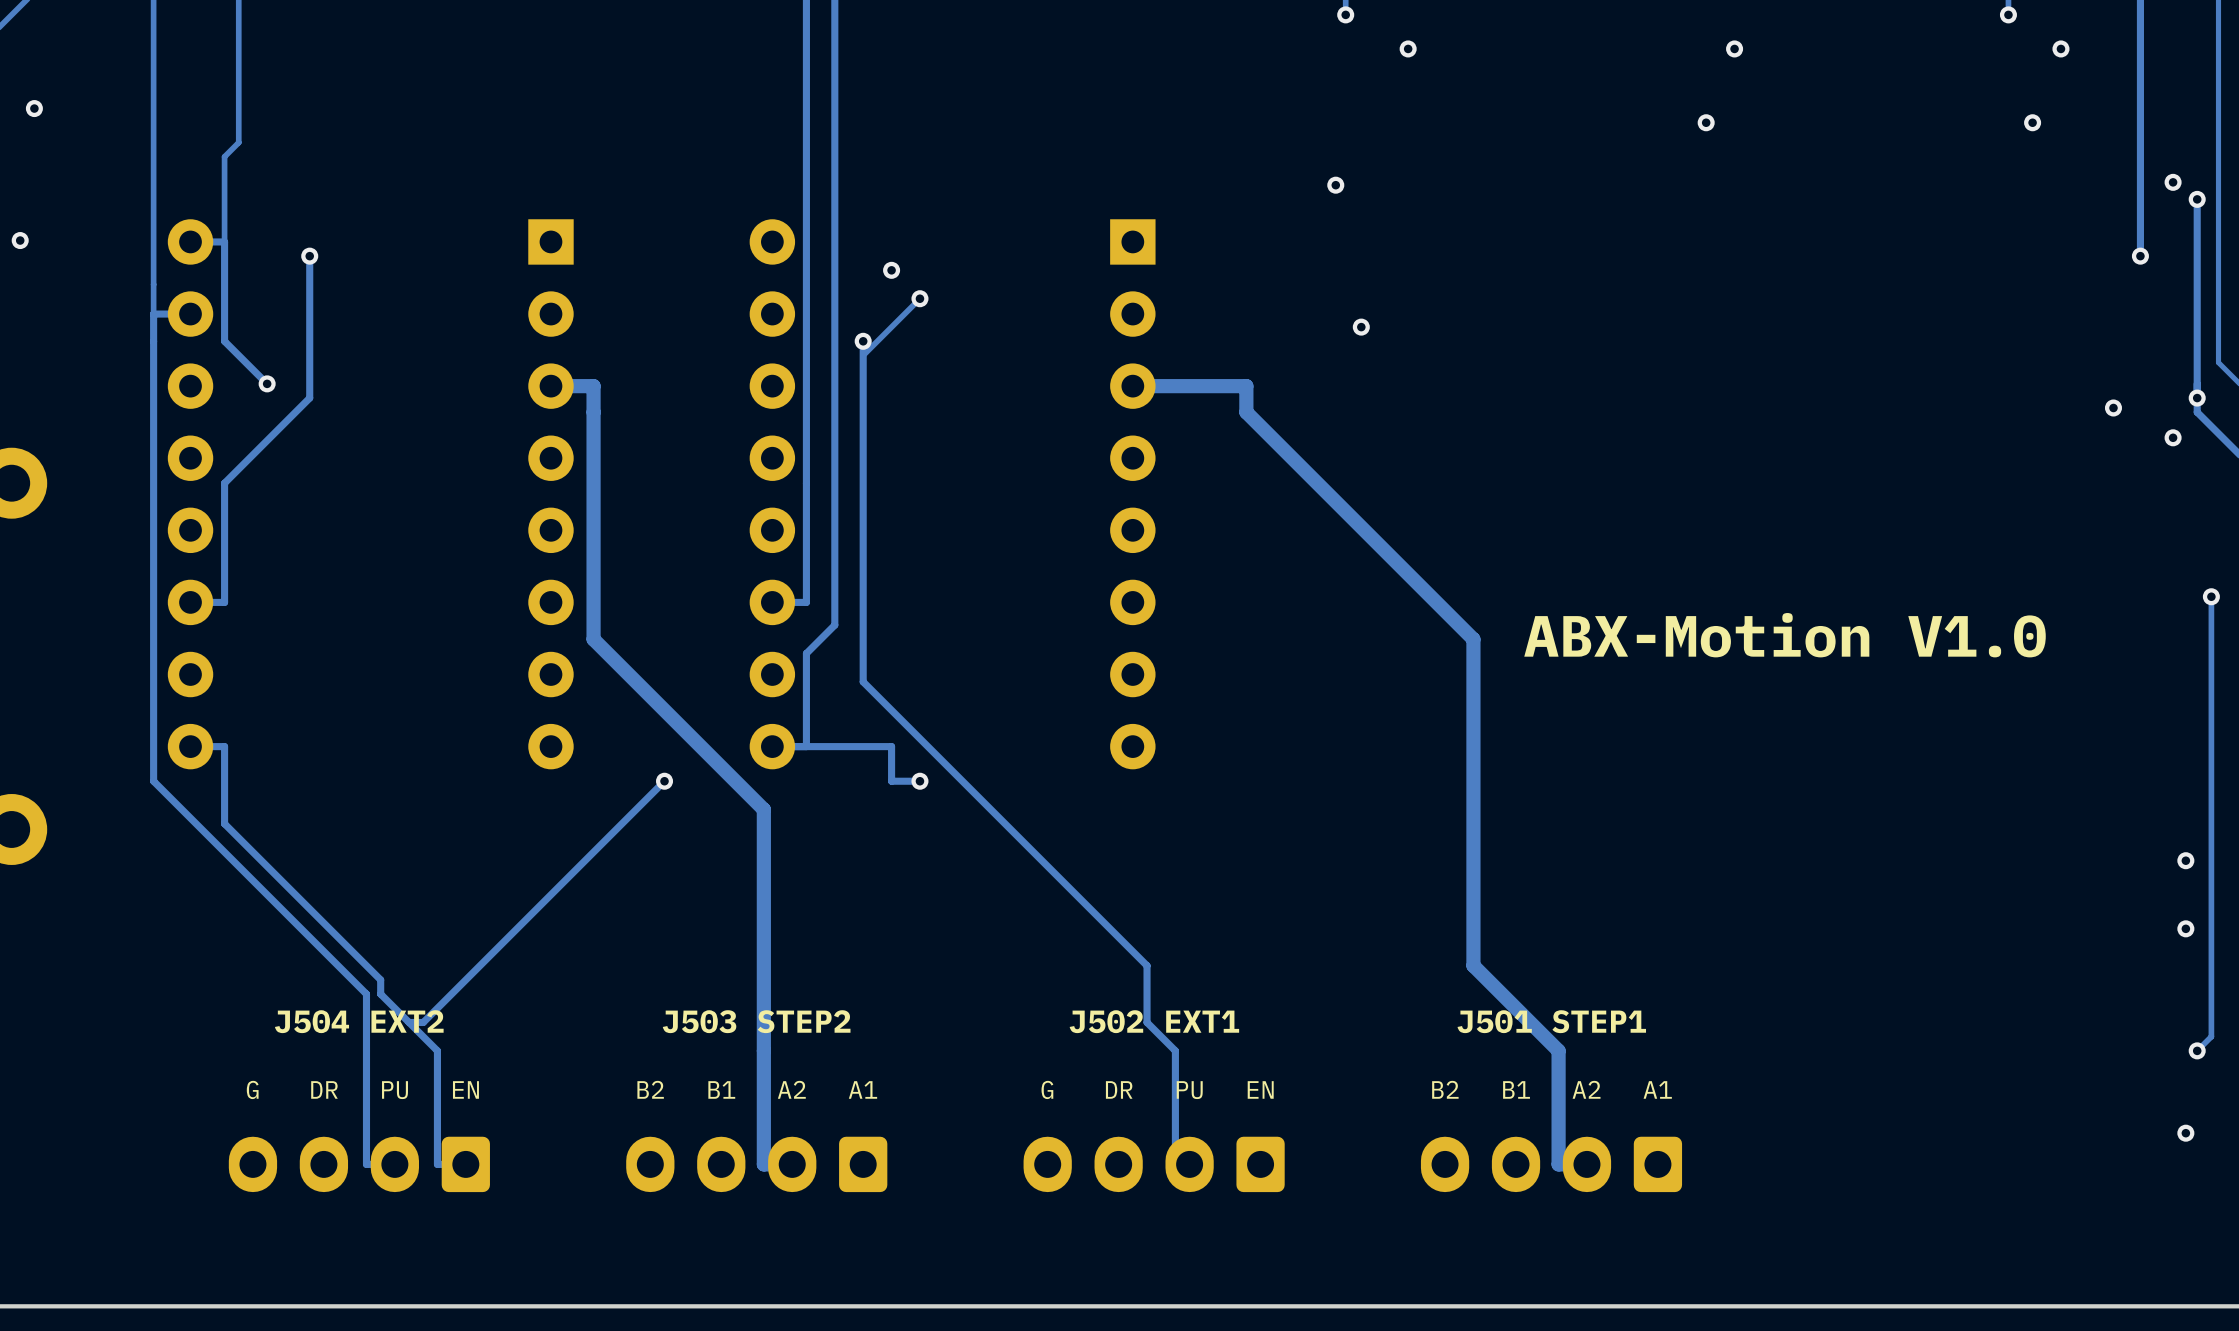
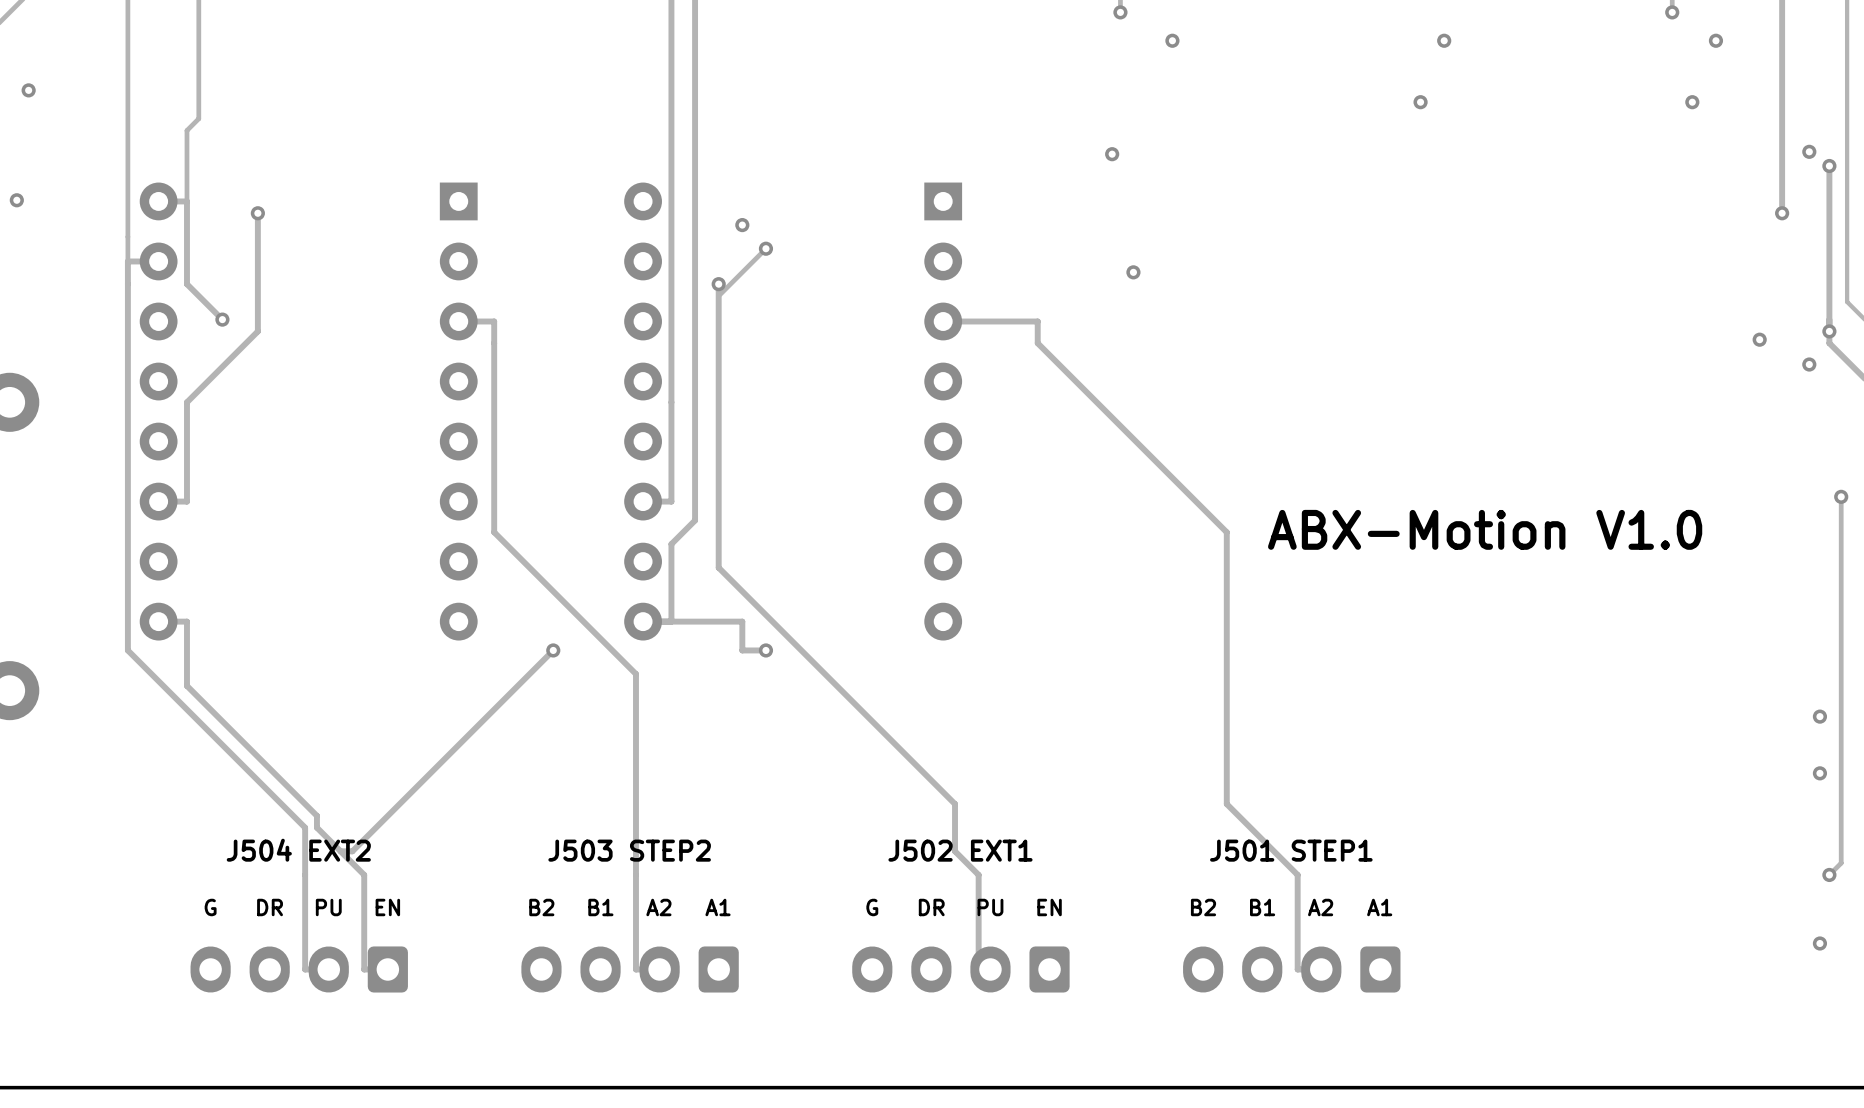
track width: thick (550, 386) (593, 386) (593, 639) (763, 809) (763, 1164) (792, 1164) -> thin (458, 321) (494, 321) (494, 532) (635, 674) (635, 969) (659, 969)
track width: thick (1132, 386) (1246, 386) (1246, 412) (1473, 639) (1473, 965) (1558, 1050) (1558, 1164) (1586, 1164) -> thin (943, 321) (1037, 321) (1037, 343) (1226, 532) (1226, 804) (1297, 874) (1297, 969) (1321, 969)

